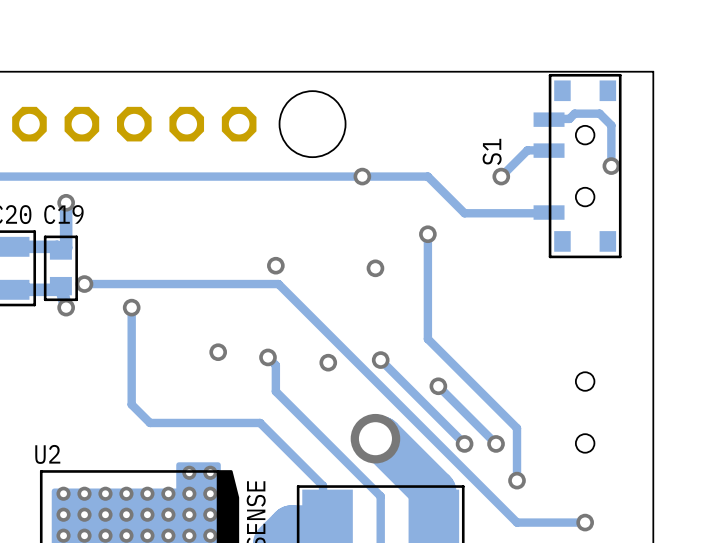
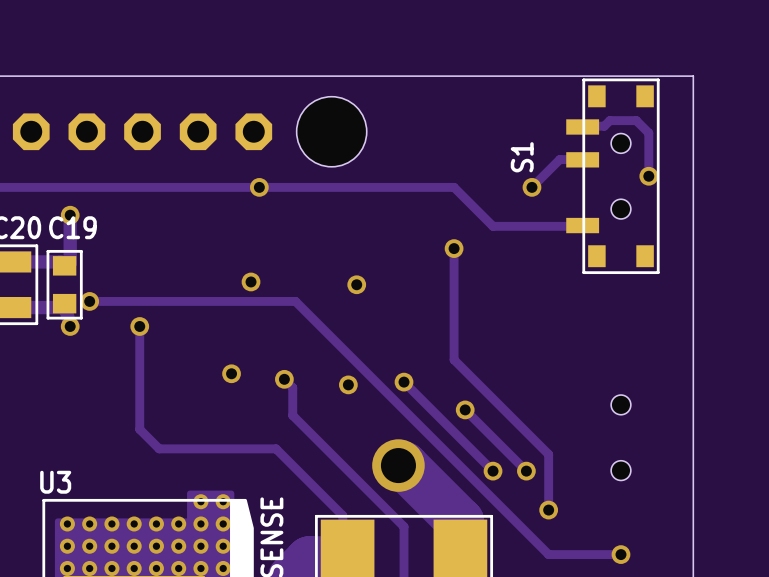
via: none -> (259, 187)
via: (362, 176) -> none
via: none -> (251, 281)
via: (275, 265) -> none
via: none -> (356, 284)
via: (375, 268) -> none
U2 name: U2 (47, 454) -> U3 (55, 482)

